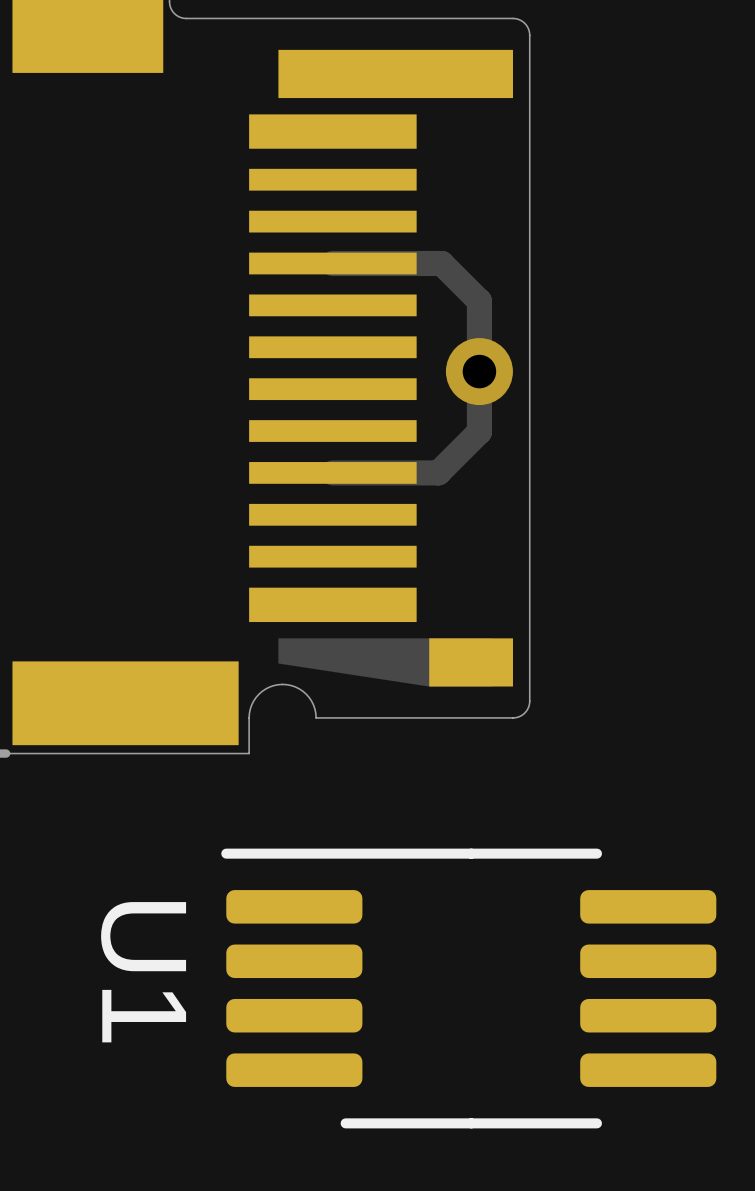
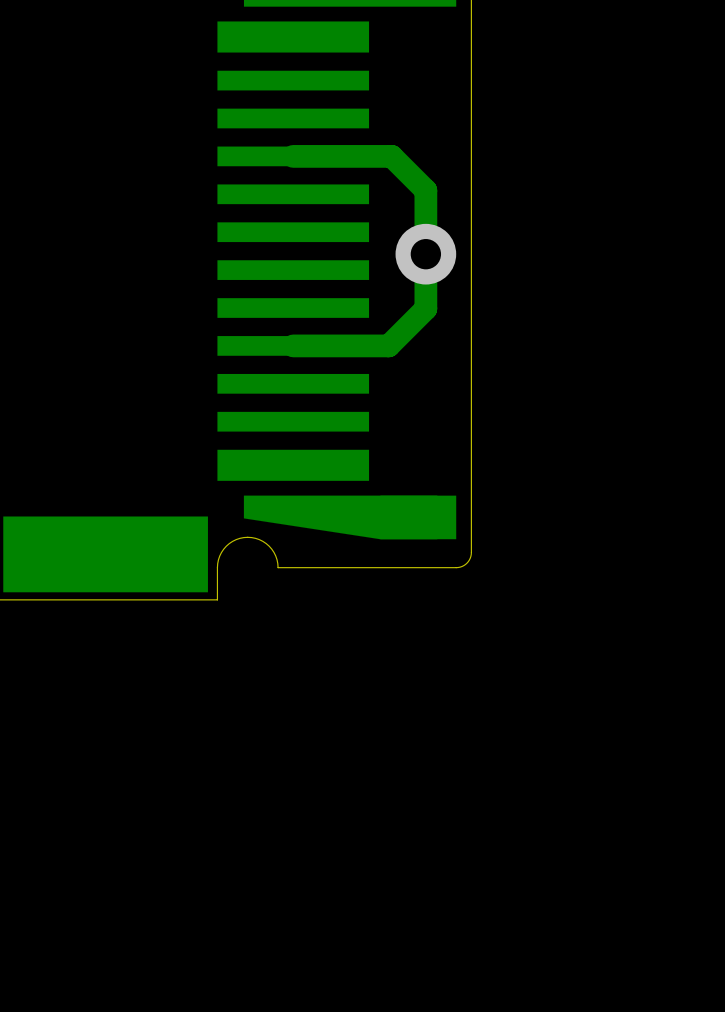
U1: (468, 988) -> none

